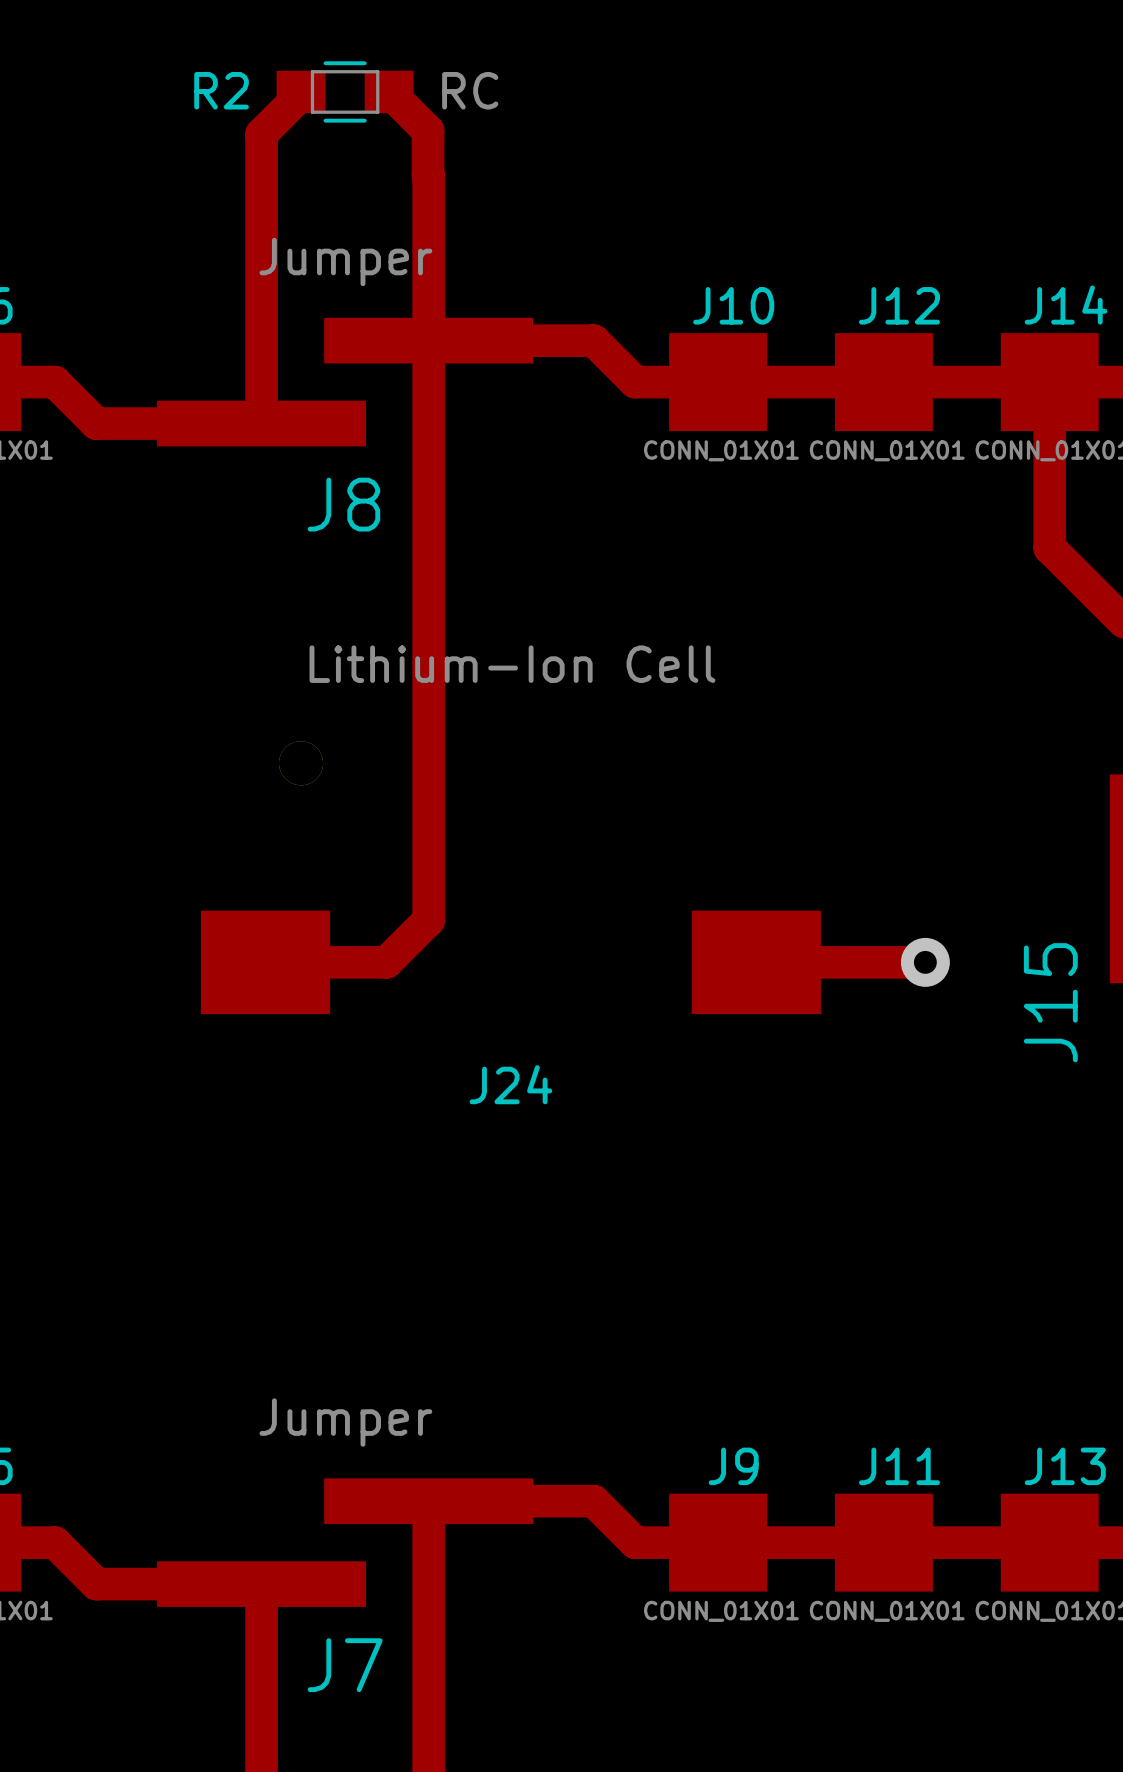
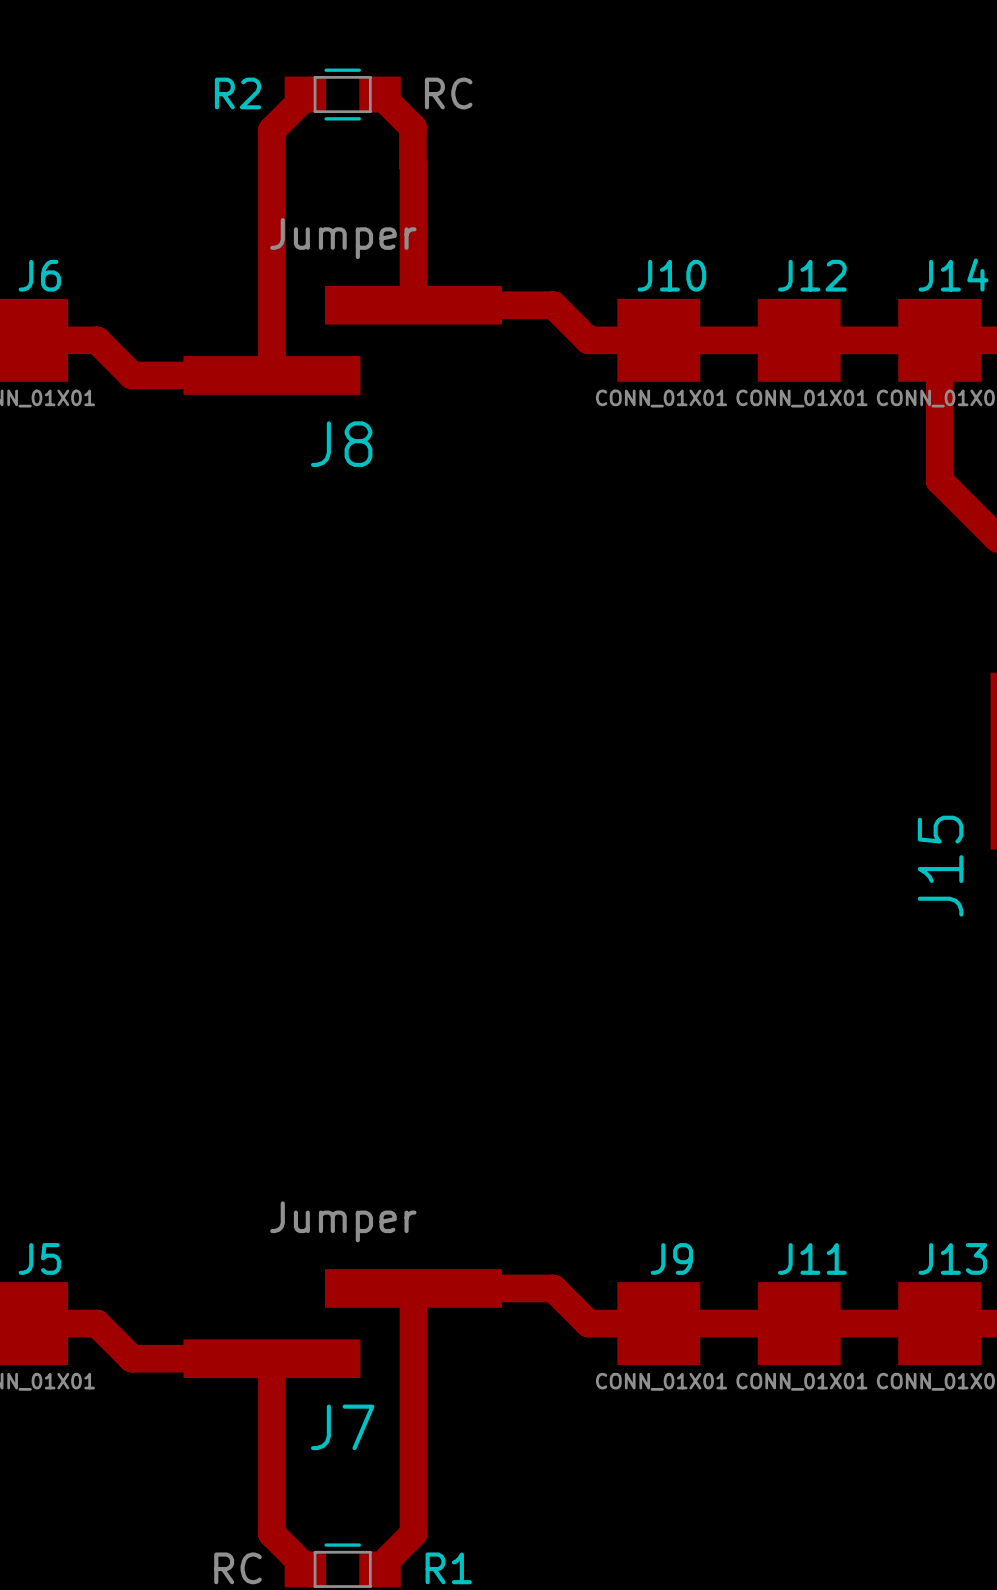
track: (428, 340) (428, 920) (386, 962) (265, 962) -> none
J24: Lithium-Ion Cell (510, 877) -> none
track: (756, 962) (925, 962) -> none
via: (925, 962) -> none

